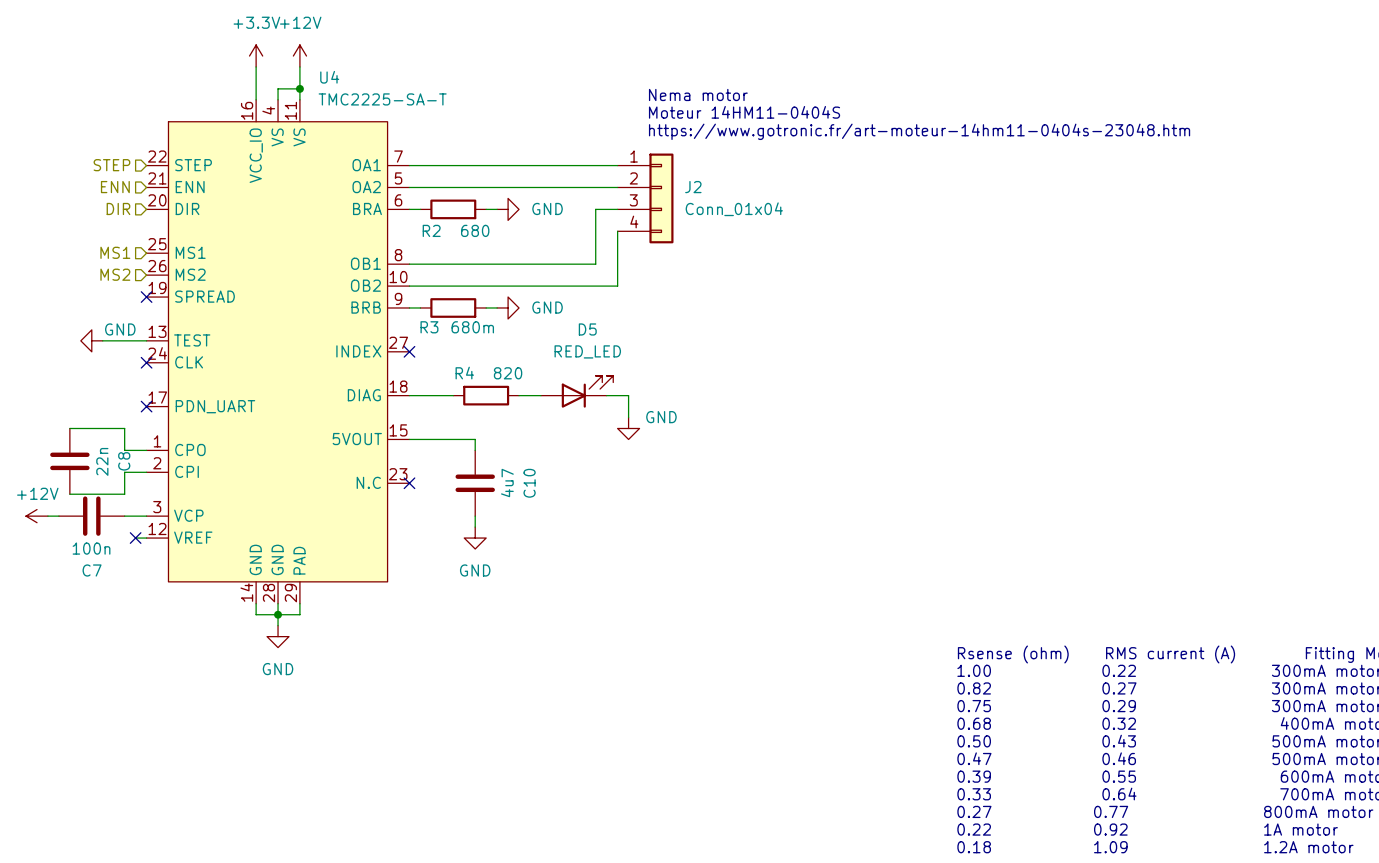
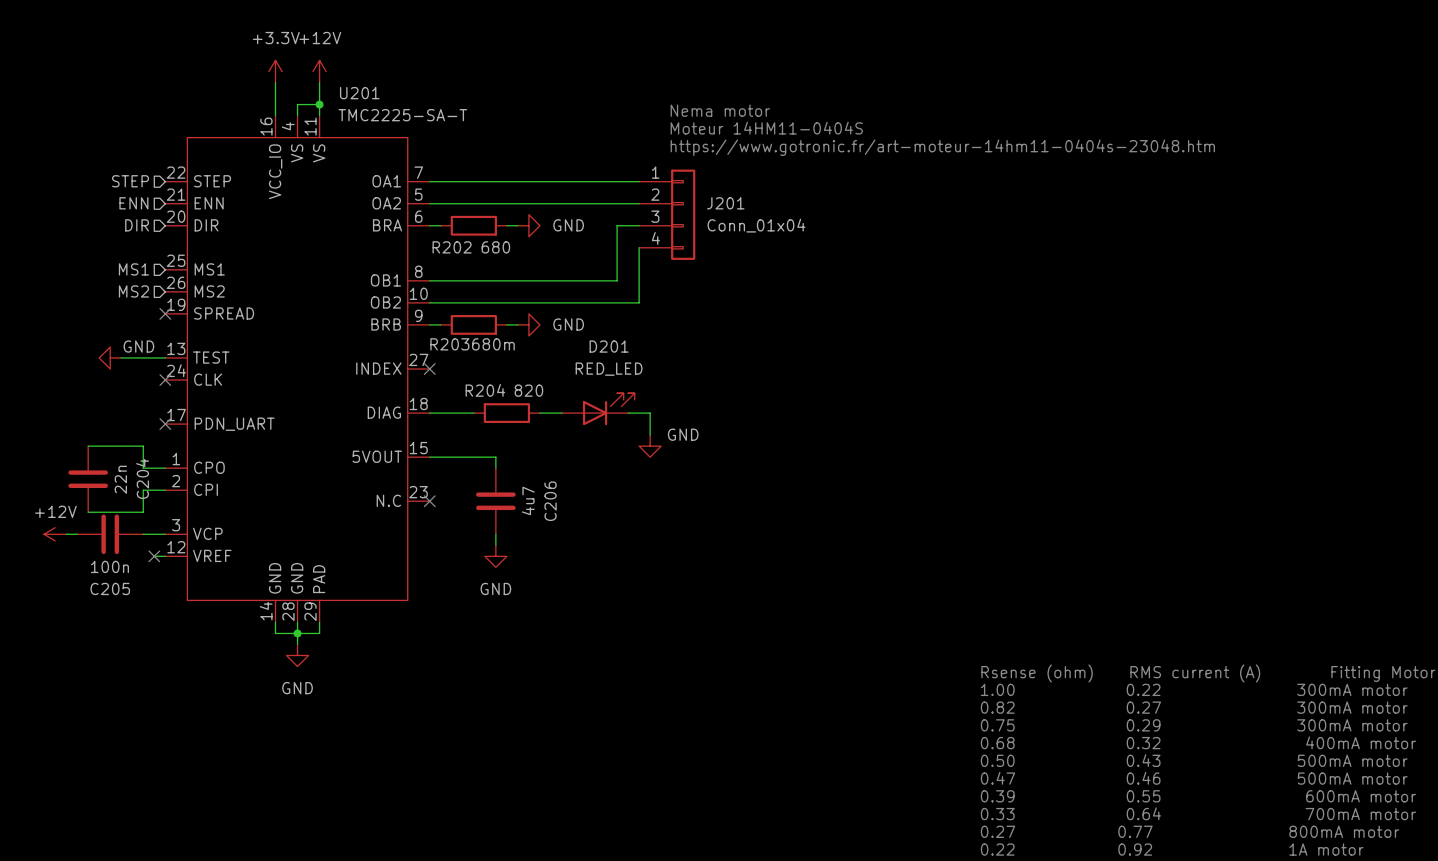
U4 name: U4 (329, 77) -> U201 (359, 93)
J2 name: J2 (693, 187) -> J201 (725, 203)
R2 name: R2 (431, 230) -> R202 (452, 247)
R3 name: R3 (429, 327) -> R203 (449, 344)
D5 name: D5 (587, 329) -> D201 (609, 346)
R4 name: R4 (464, 373) -> R204 (485, 390)
C8 name: C8 (124, 461) -> C204 (142, 478)
C10 name: C10 (529, 483) -> C206 (550, 501)
C7 name: C7 (92, 570) -> C205 (110, 588)

